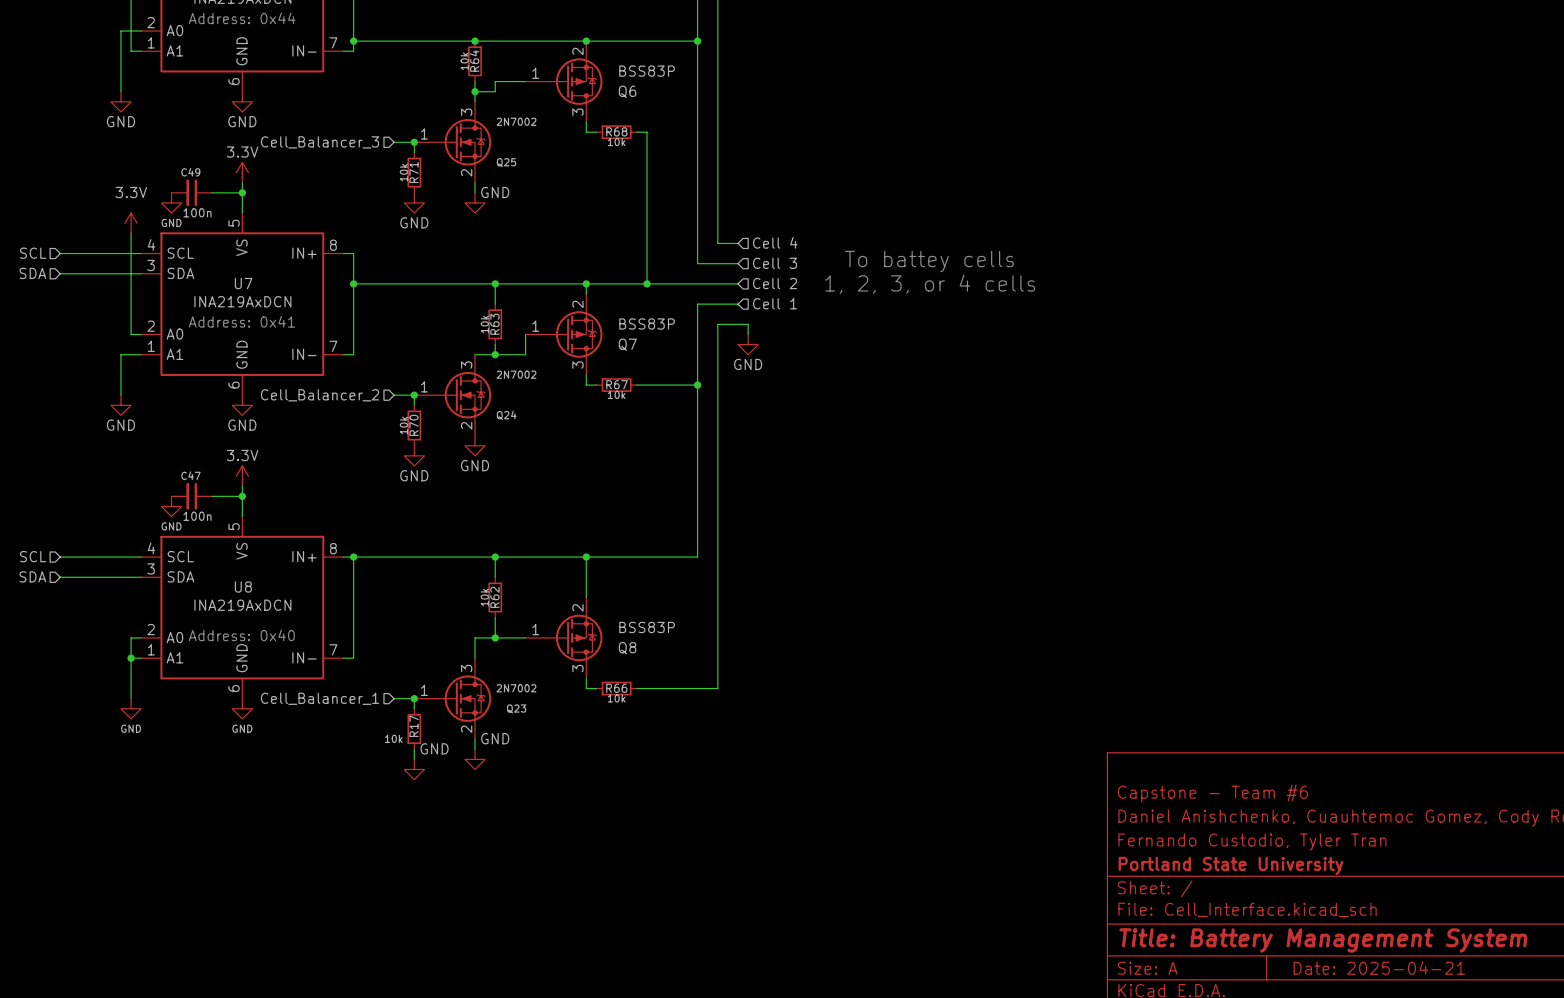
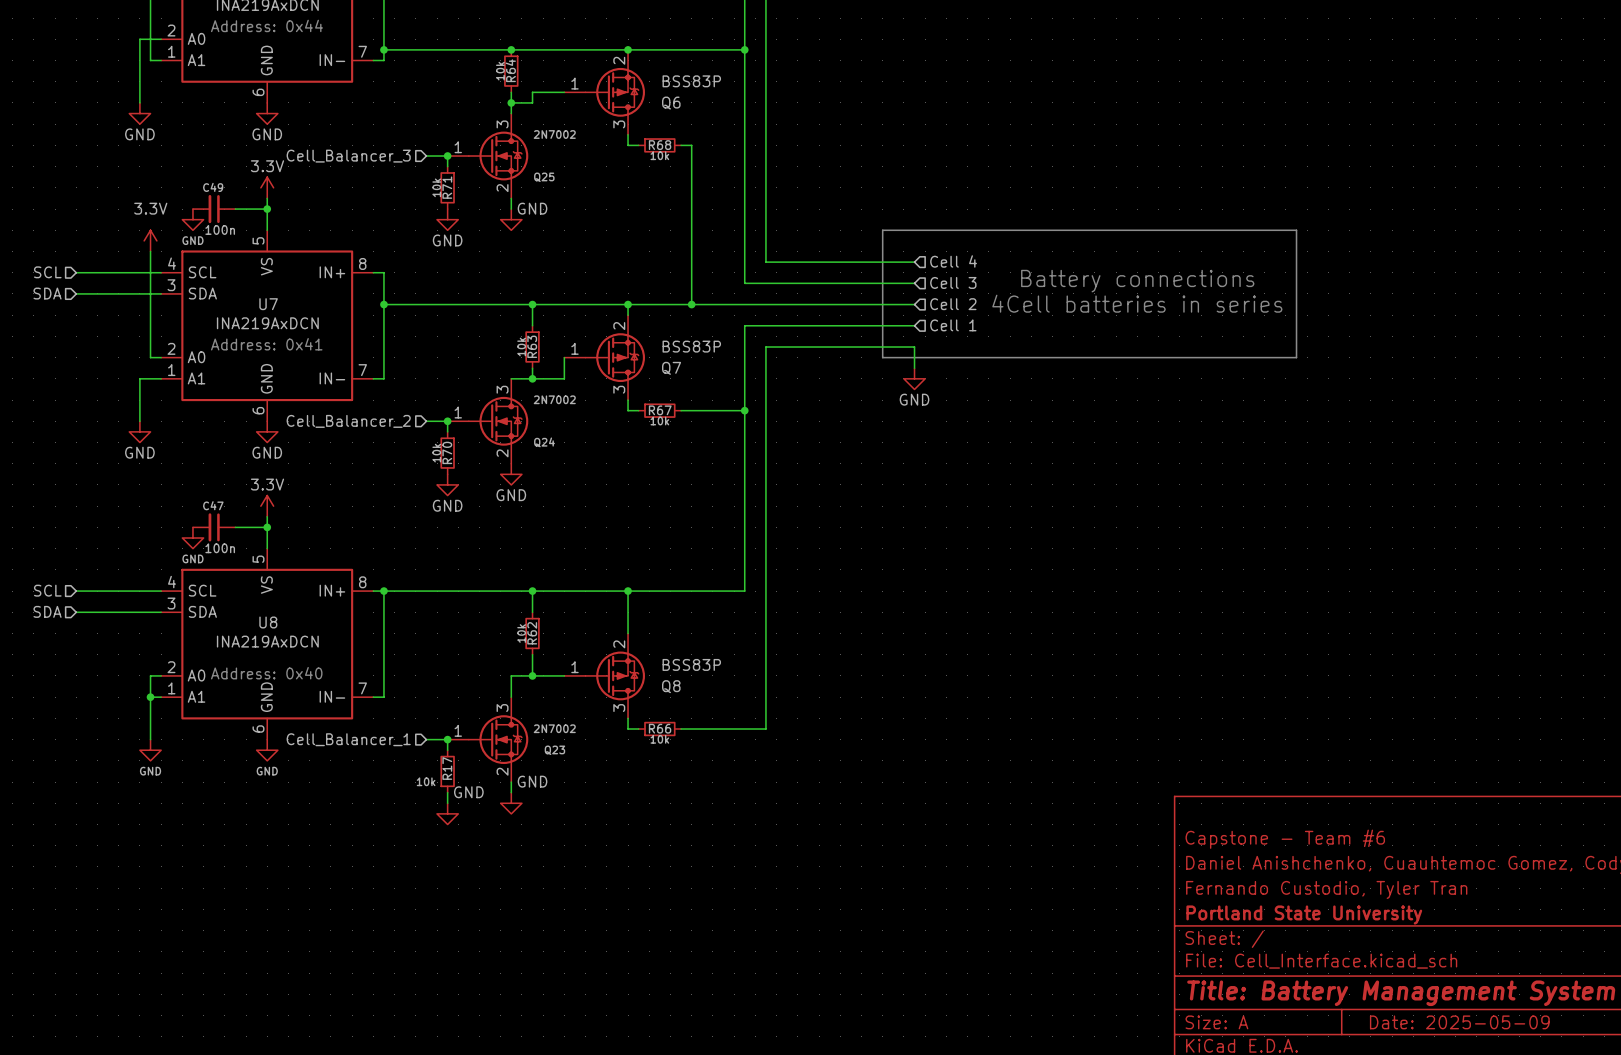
line: none -> (882, 230) (1296, 230) (1296, 357) (882, 357) (882, 230)
hierarchical label position: Cell 4 (775, 242) -> Cell 4 (953, 261)
wire: none -> (787, 262) (914, 262)
text: To battey cells (929, 261) -> none
text: none -> Battery connections (1137, 281)
wire: none -> (787, 283) (914, 283)
hierarchical label position: Cell 3 (775, 263) -> Cell 3 (953, 282)
wire: none -> (787, 304) (914, 304)
hierarchical label position: Cell 2 (775, 283) -> Cell 2 (953, 304)
text: none -> 4Cell batteries in series (1137, 303)
text: 1, 2, 3, or 4 cells (930, 284) -> none
hierarchical label position: Cell 1 (775, 303) -> Cell 1 (953, 325)
wire: none -> (787, 325) (914, 325)
wire: (748, 324) (748, 334) -> (797, 347) (914, 347) (914, 368)
power symbol position: GND (748, 344) -> GND (914, 378)
title block: Date: 2025-04-21 (1379, 967) -> Date: 2025-05-09 (1459, 1022)

